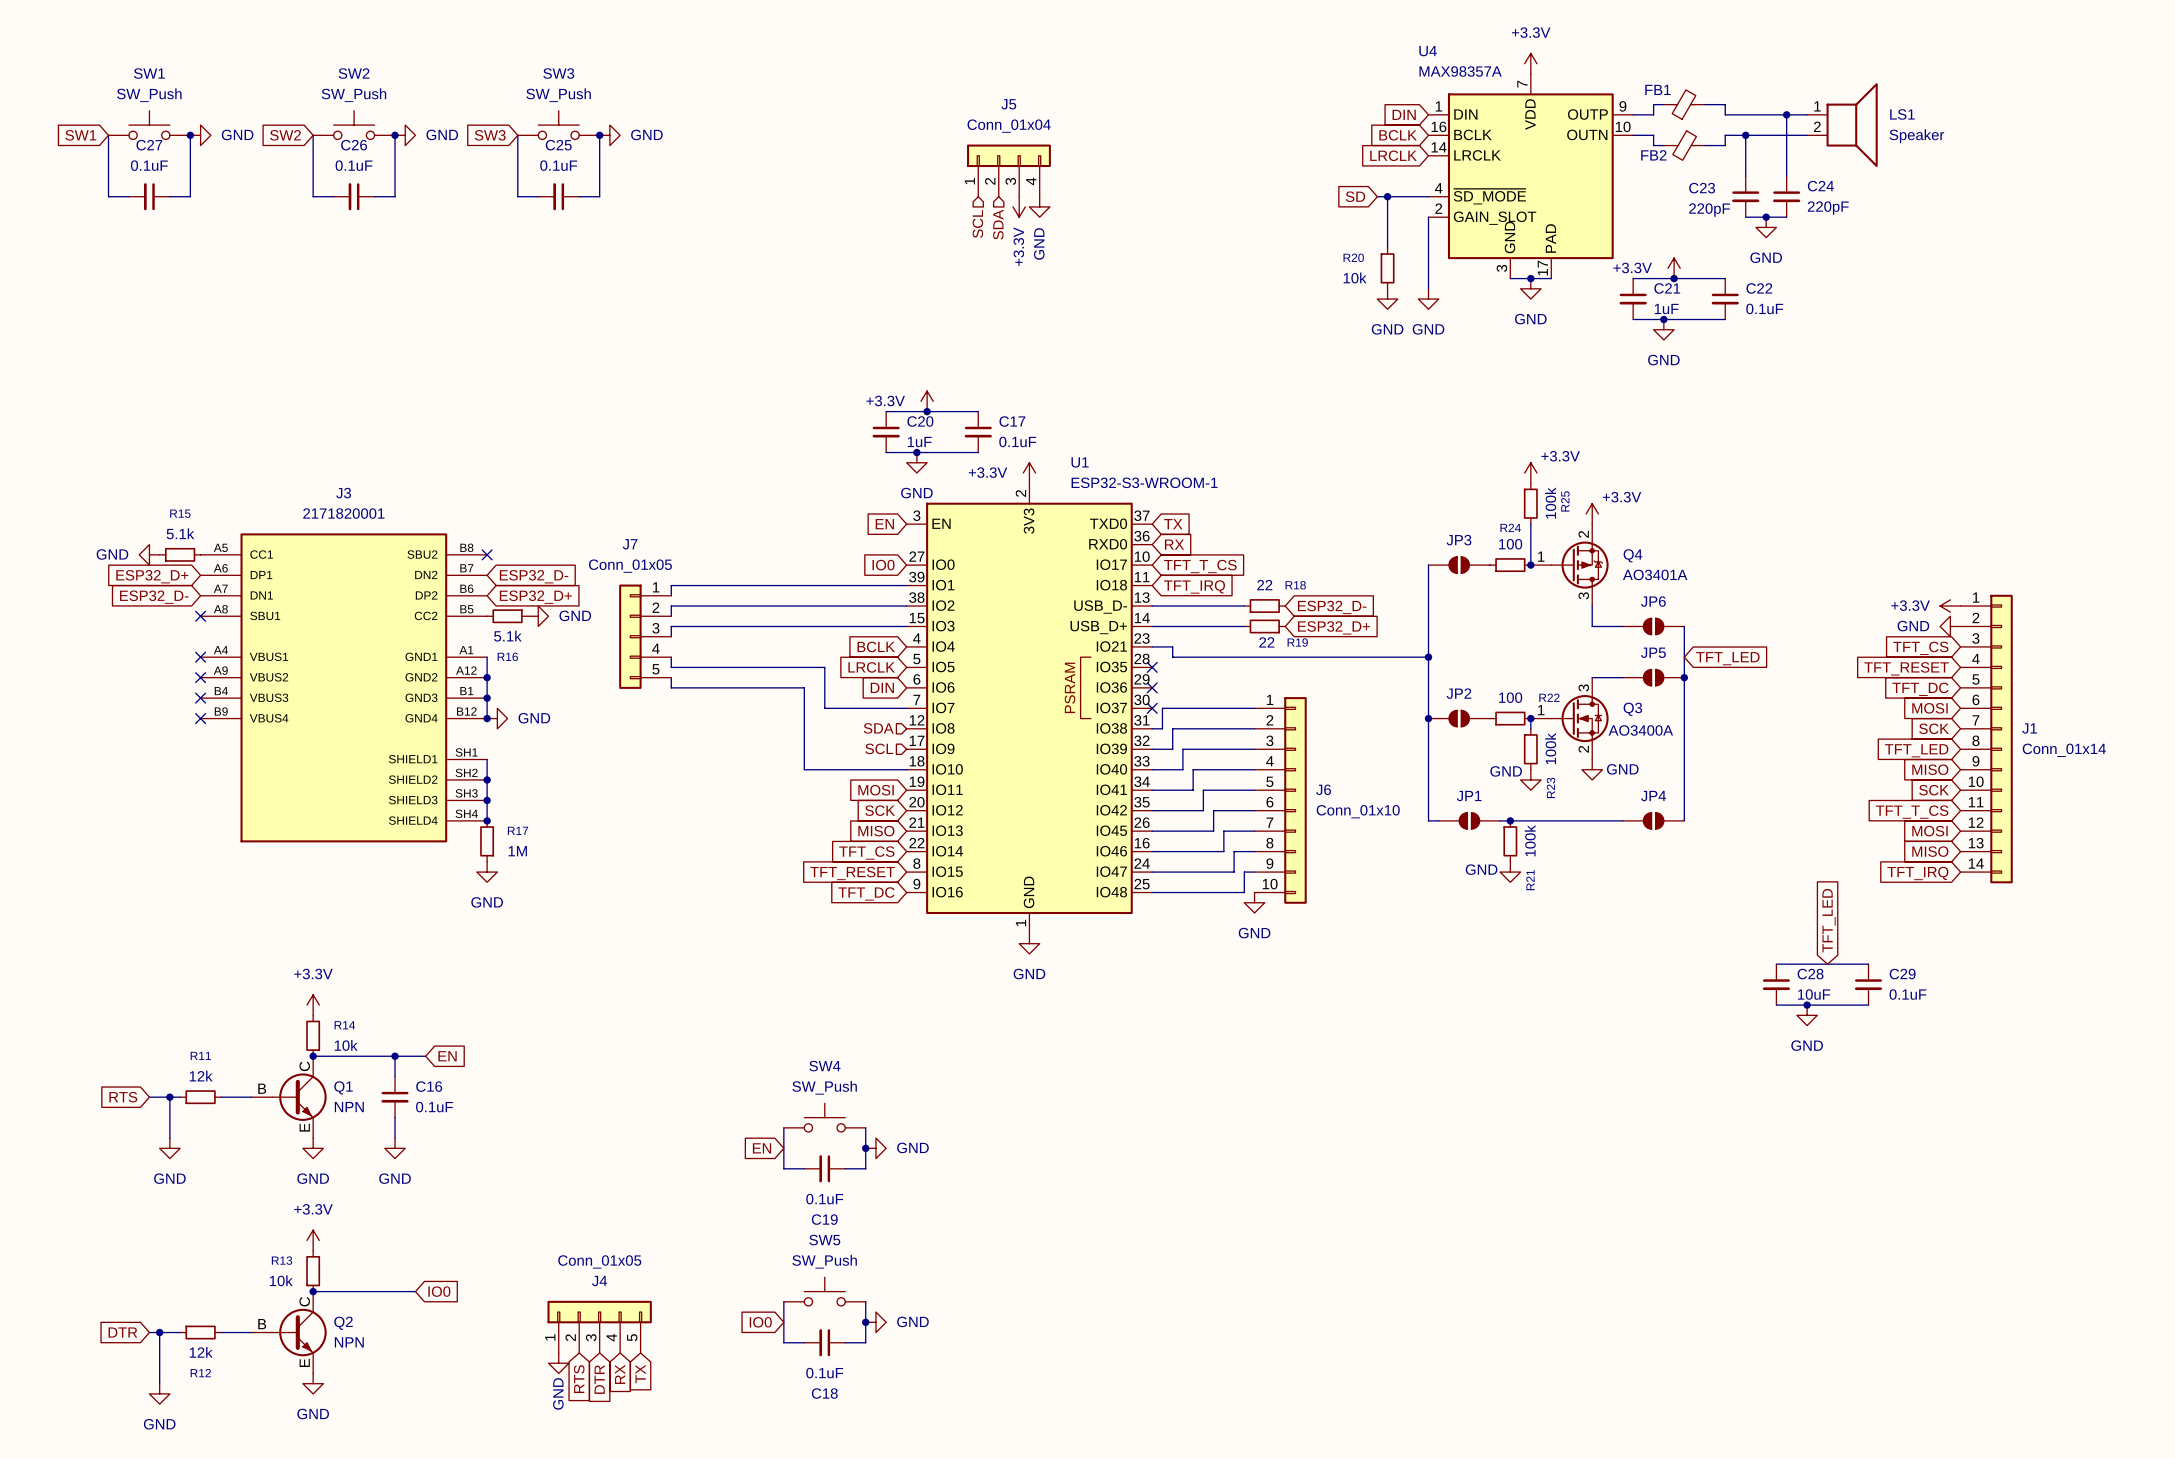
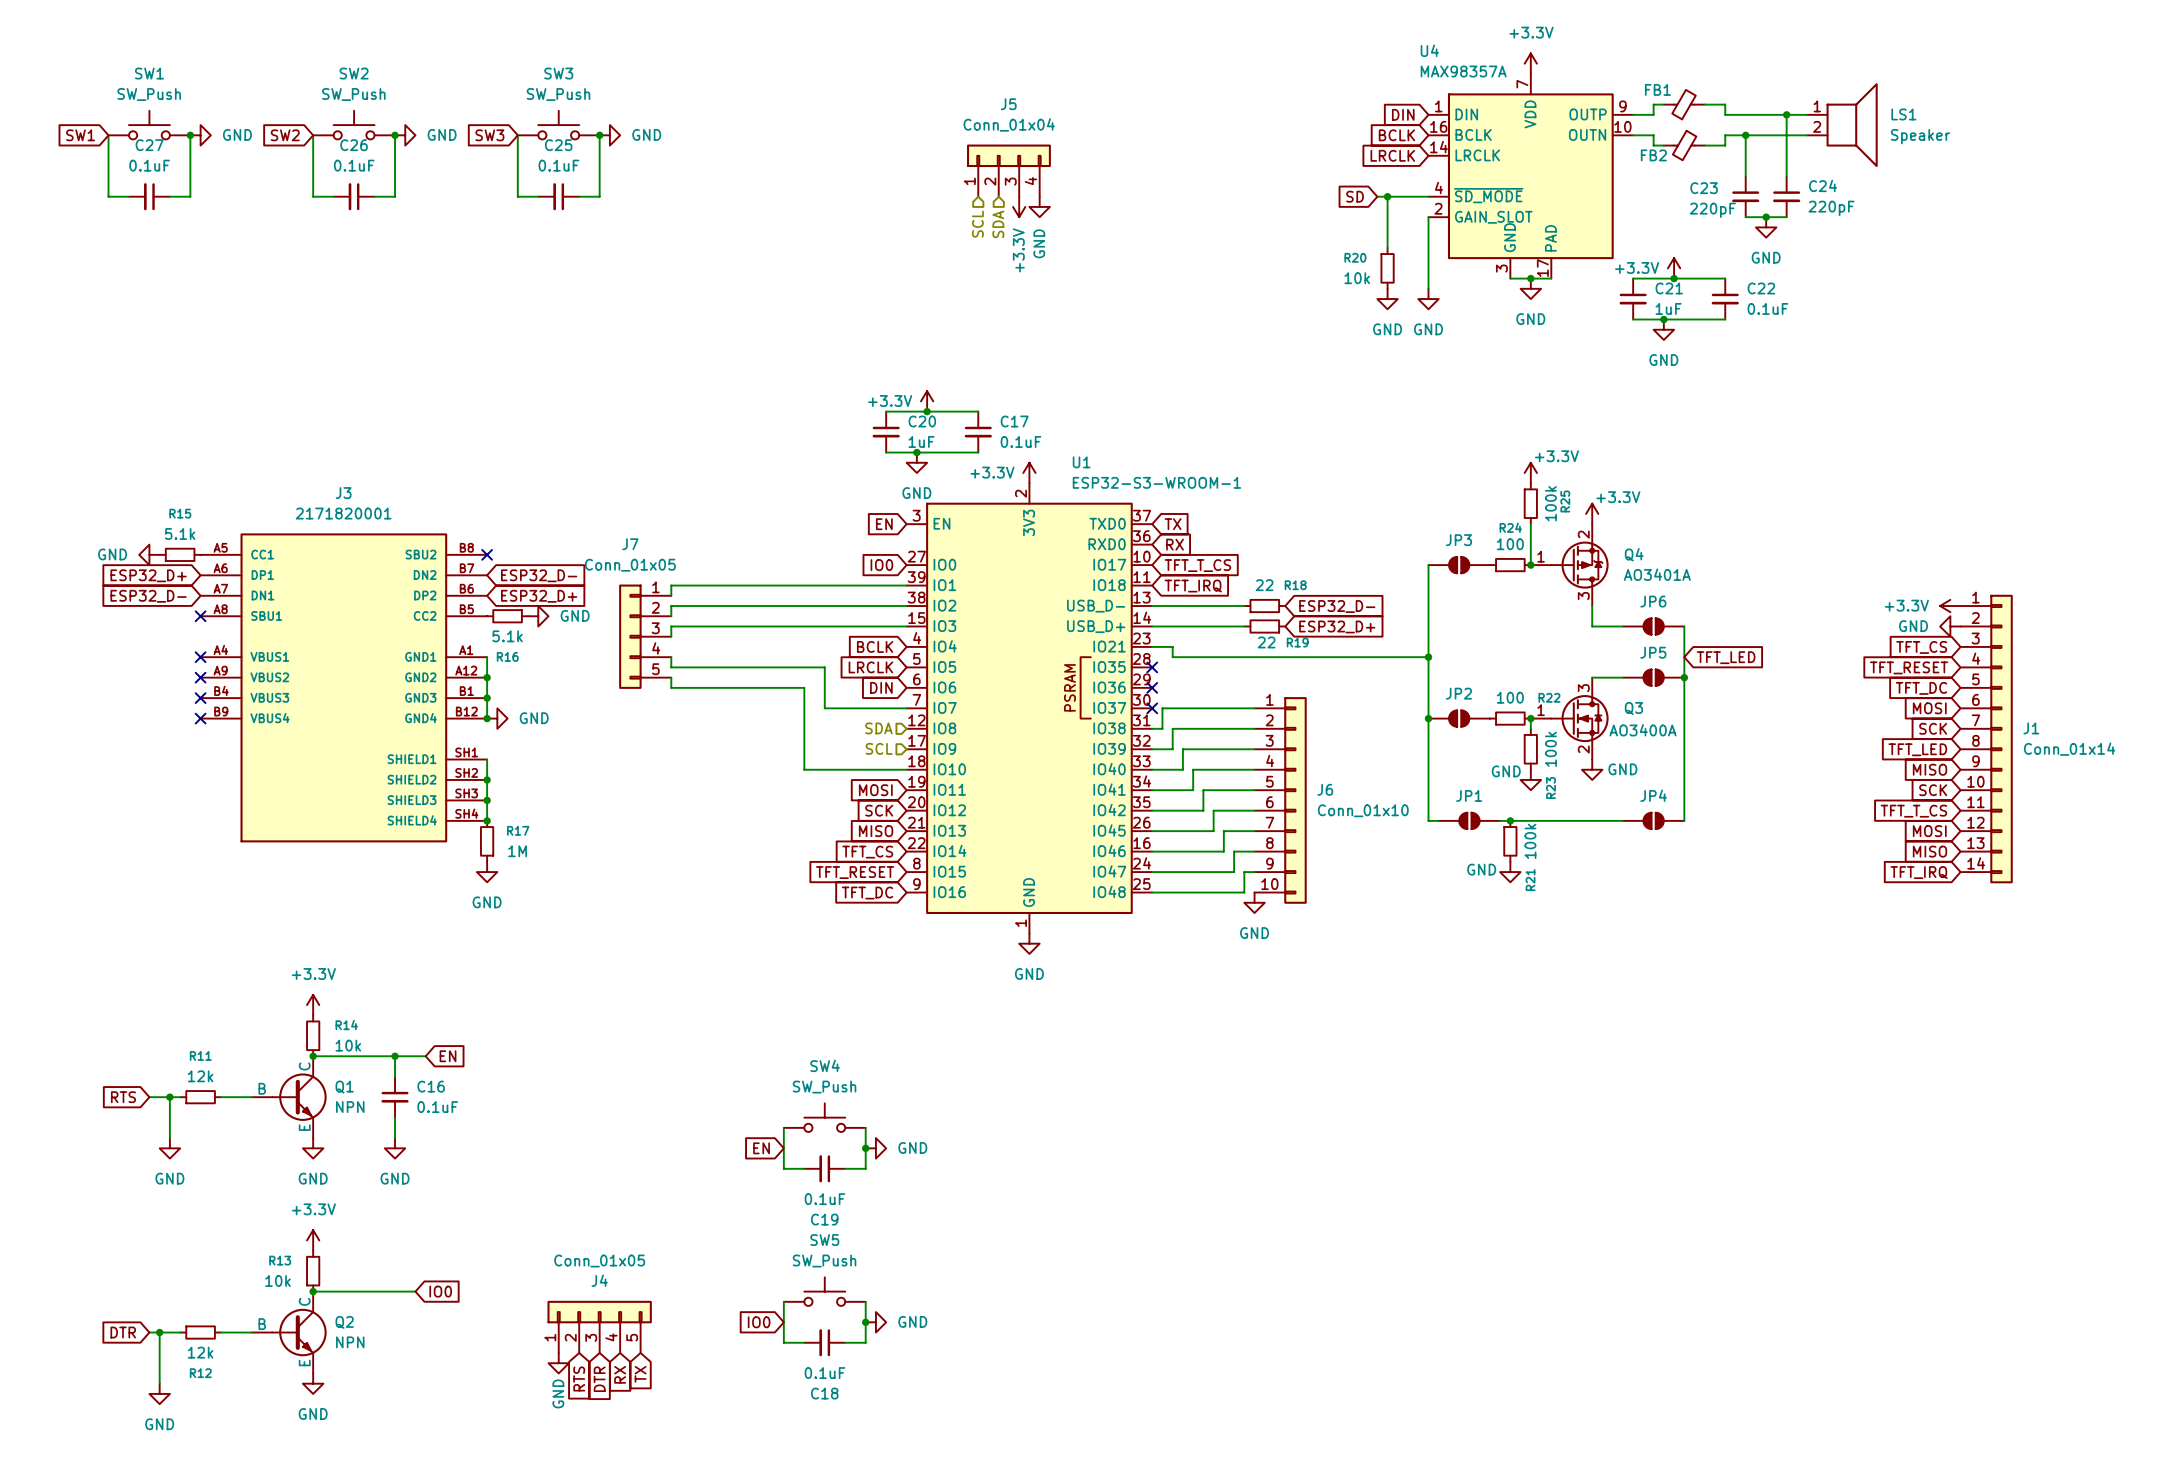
global label: TFT_LED (1829, 920) -> none
wire: (1776, 964) (1868, 964) -> none
C28: 10uF (1776, 984) -> none
C29: 0.1uF (1868, 984) -> none
wire: (1776, 1005) (1868, 1005) -> none
junction: (1807, 1005) -> none
power symbol: GND (1807, 1015) -> none

